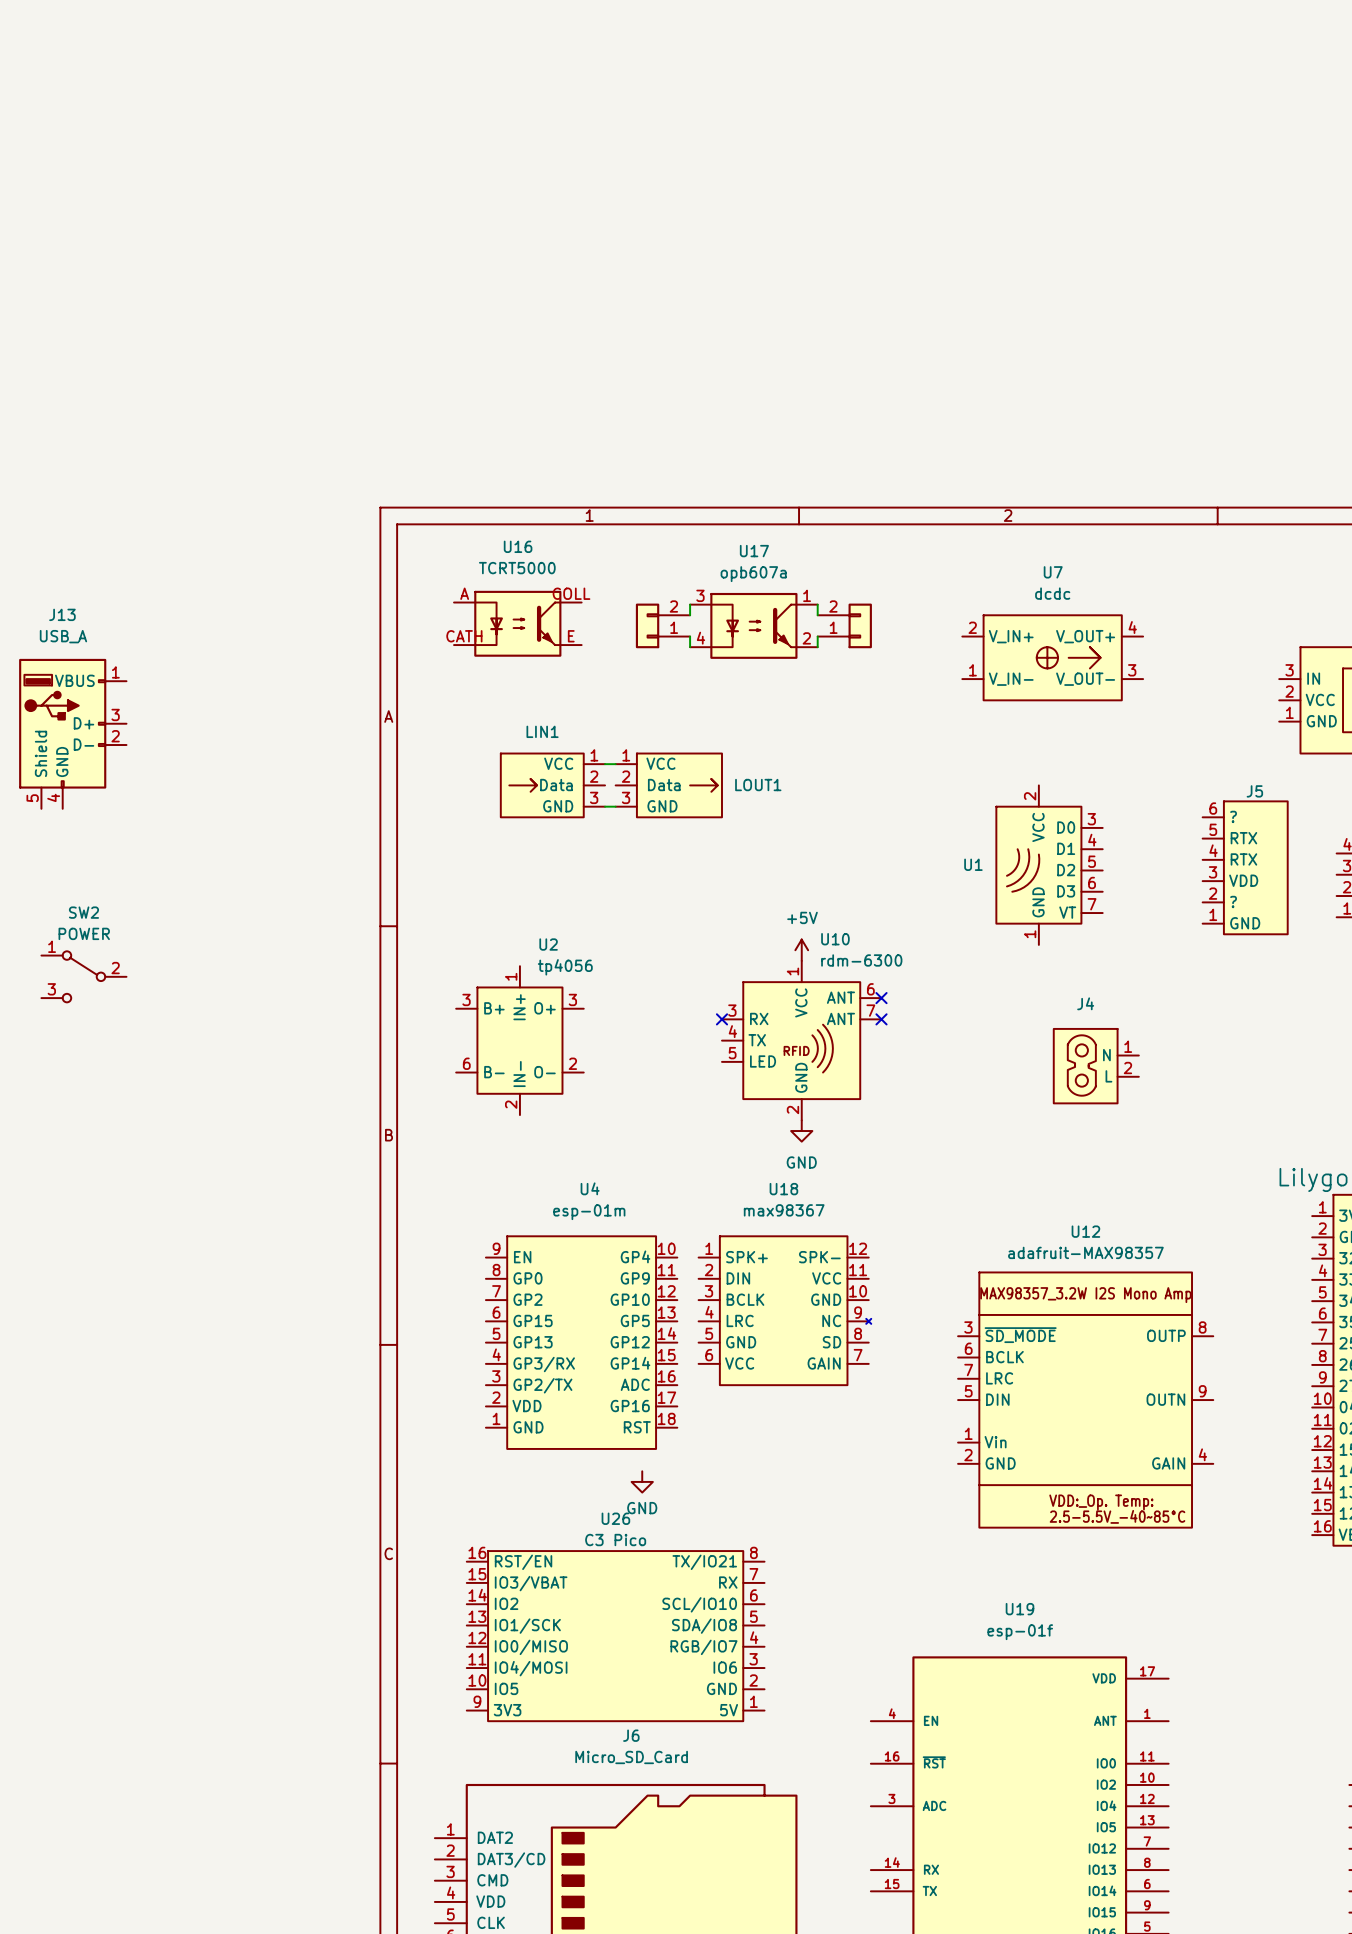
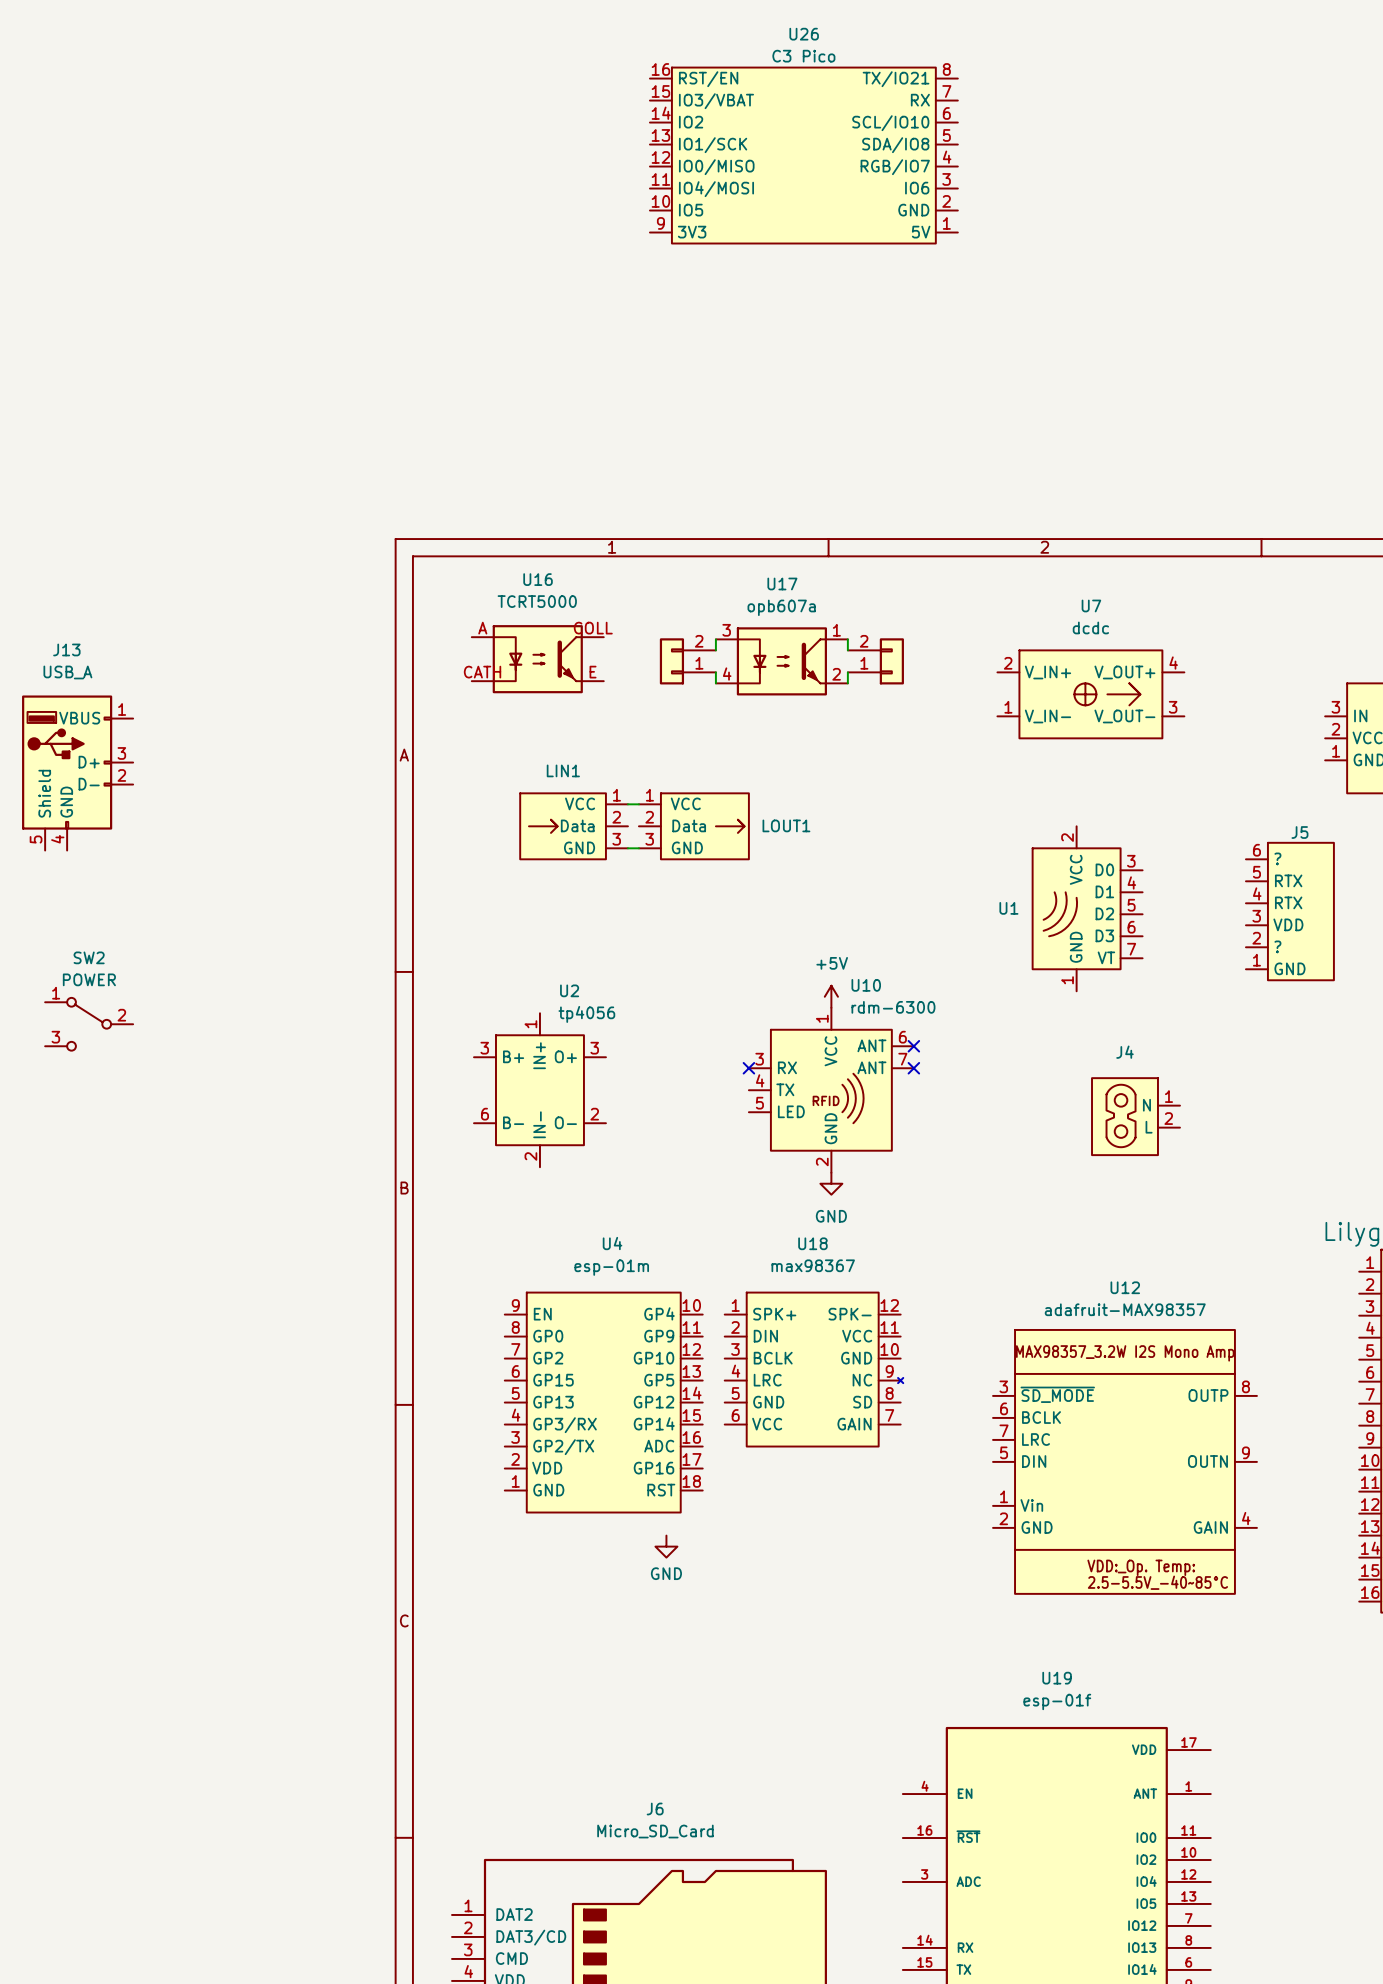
U26 position: (615, 1636) -> (803, 155)

